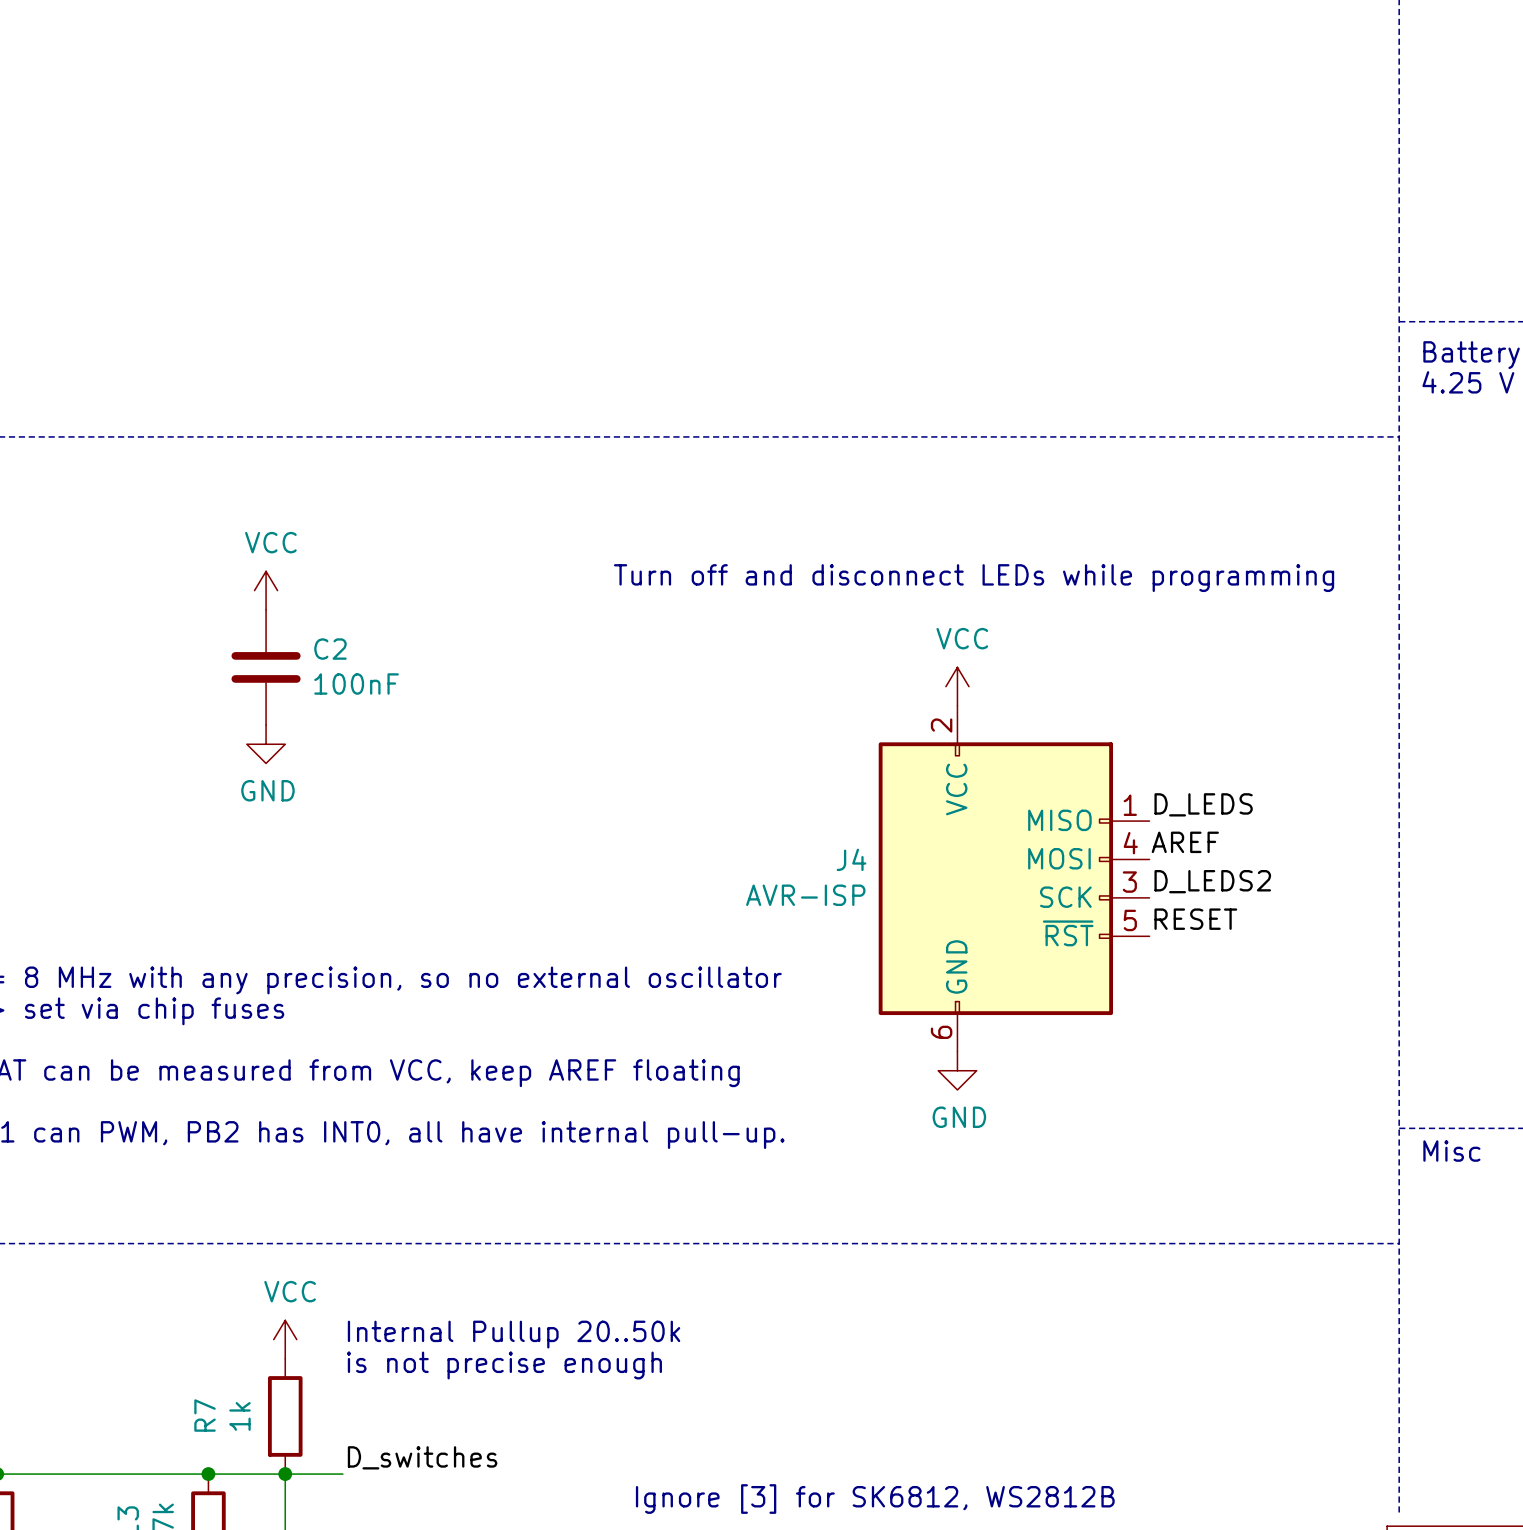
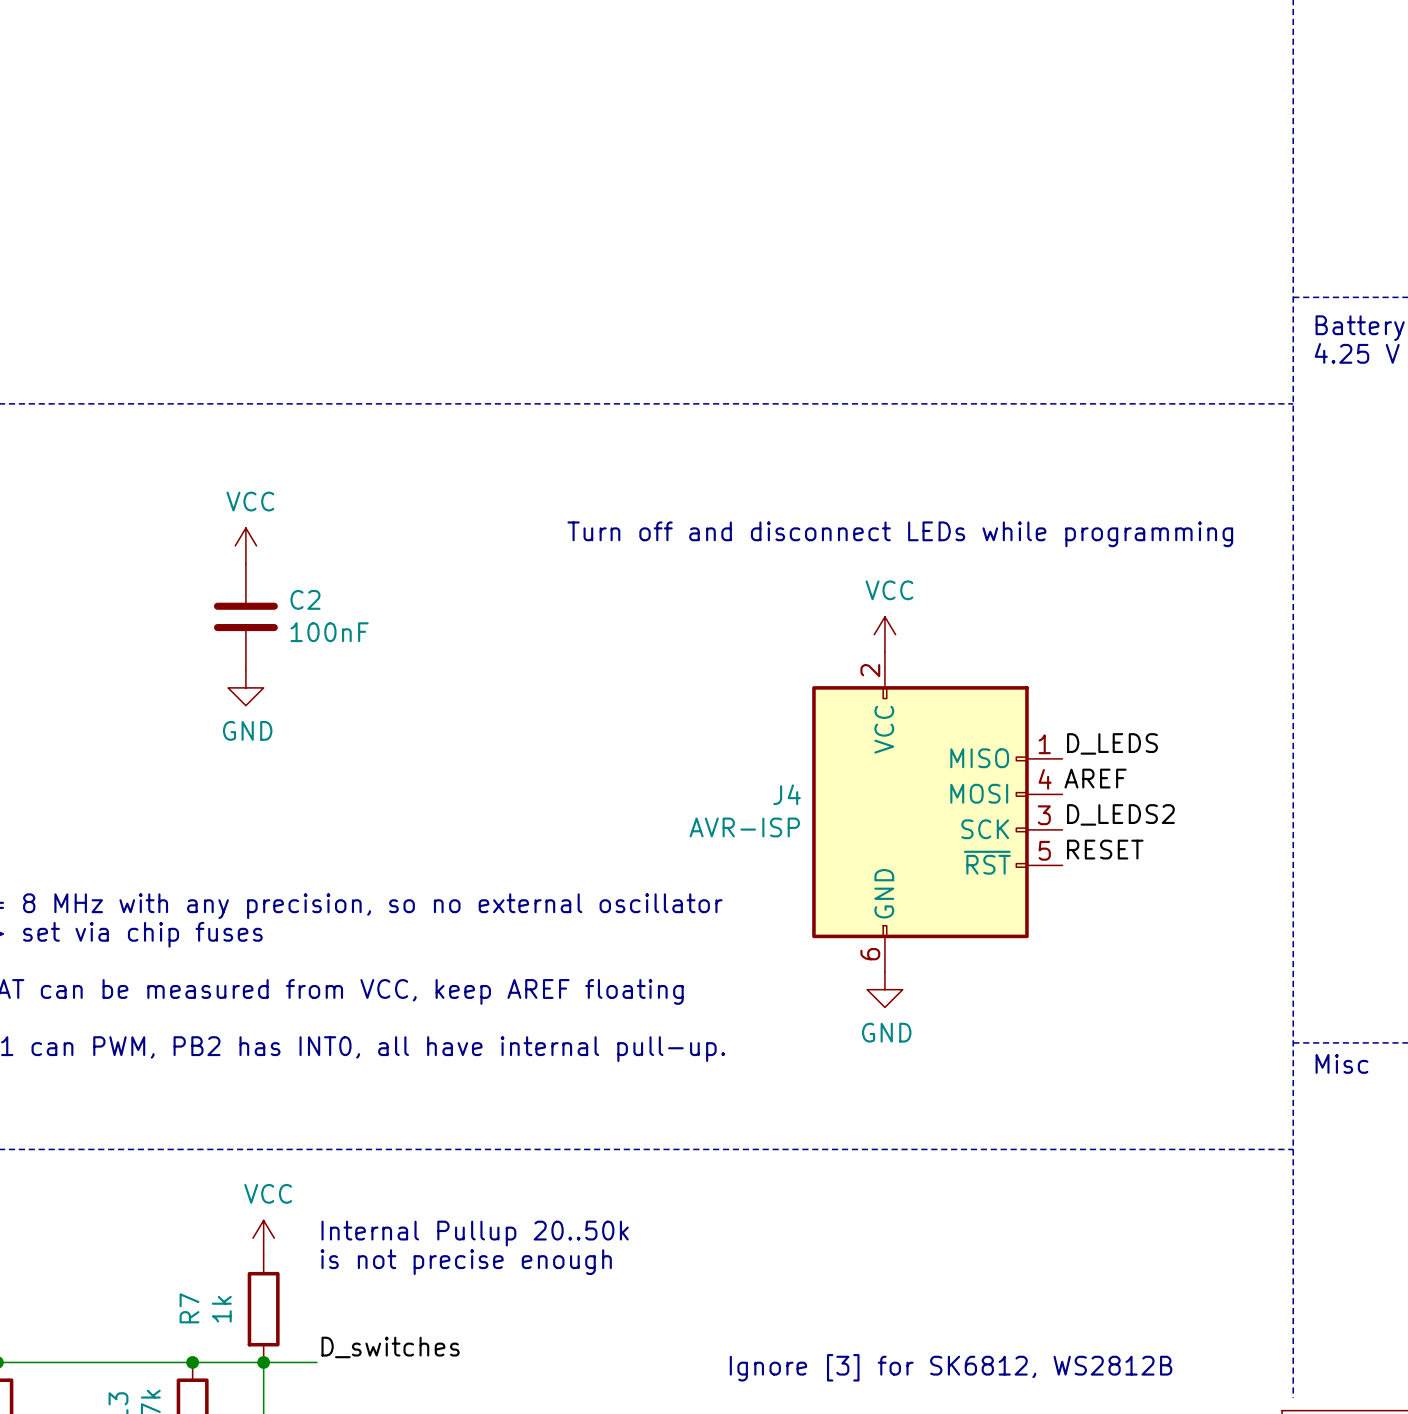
text position: Ignore [3] for SK6812, WS2812B (875, 1499) -> Ignore [3] for SK6812, WS2812B (951, 1367)

